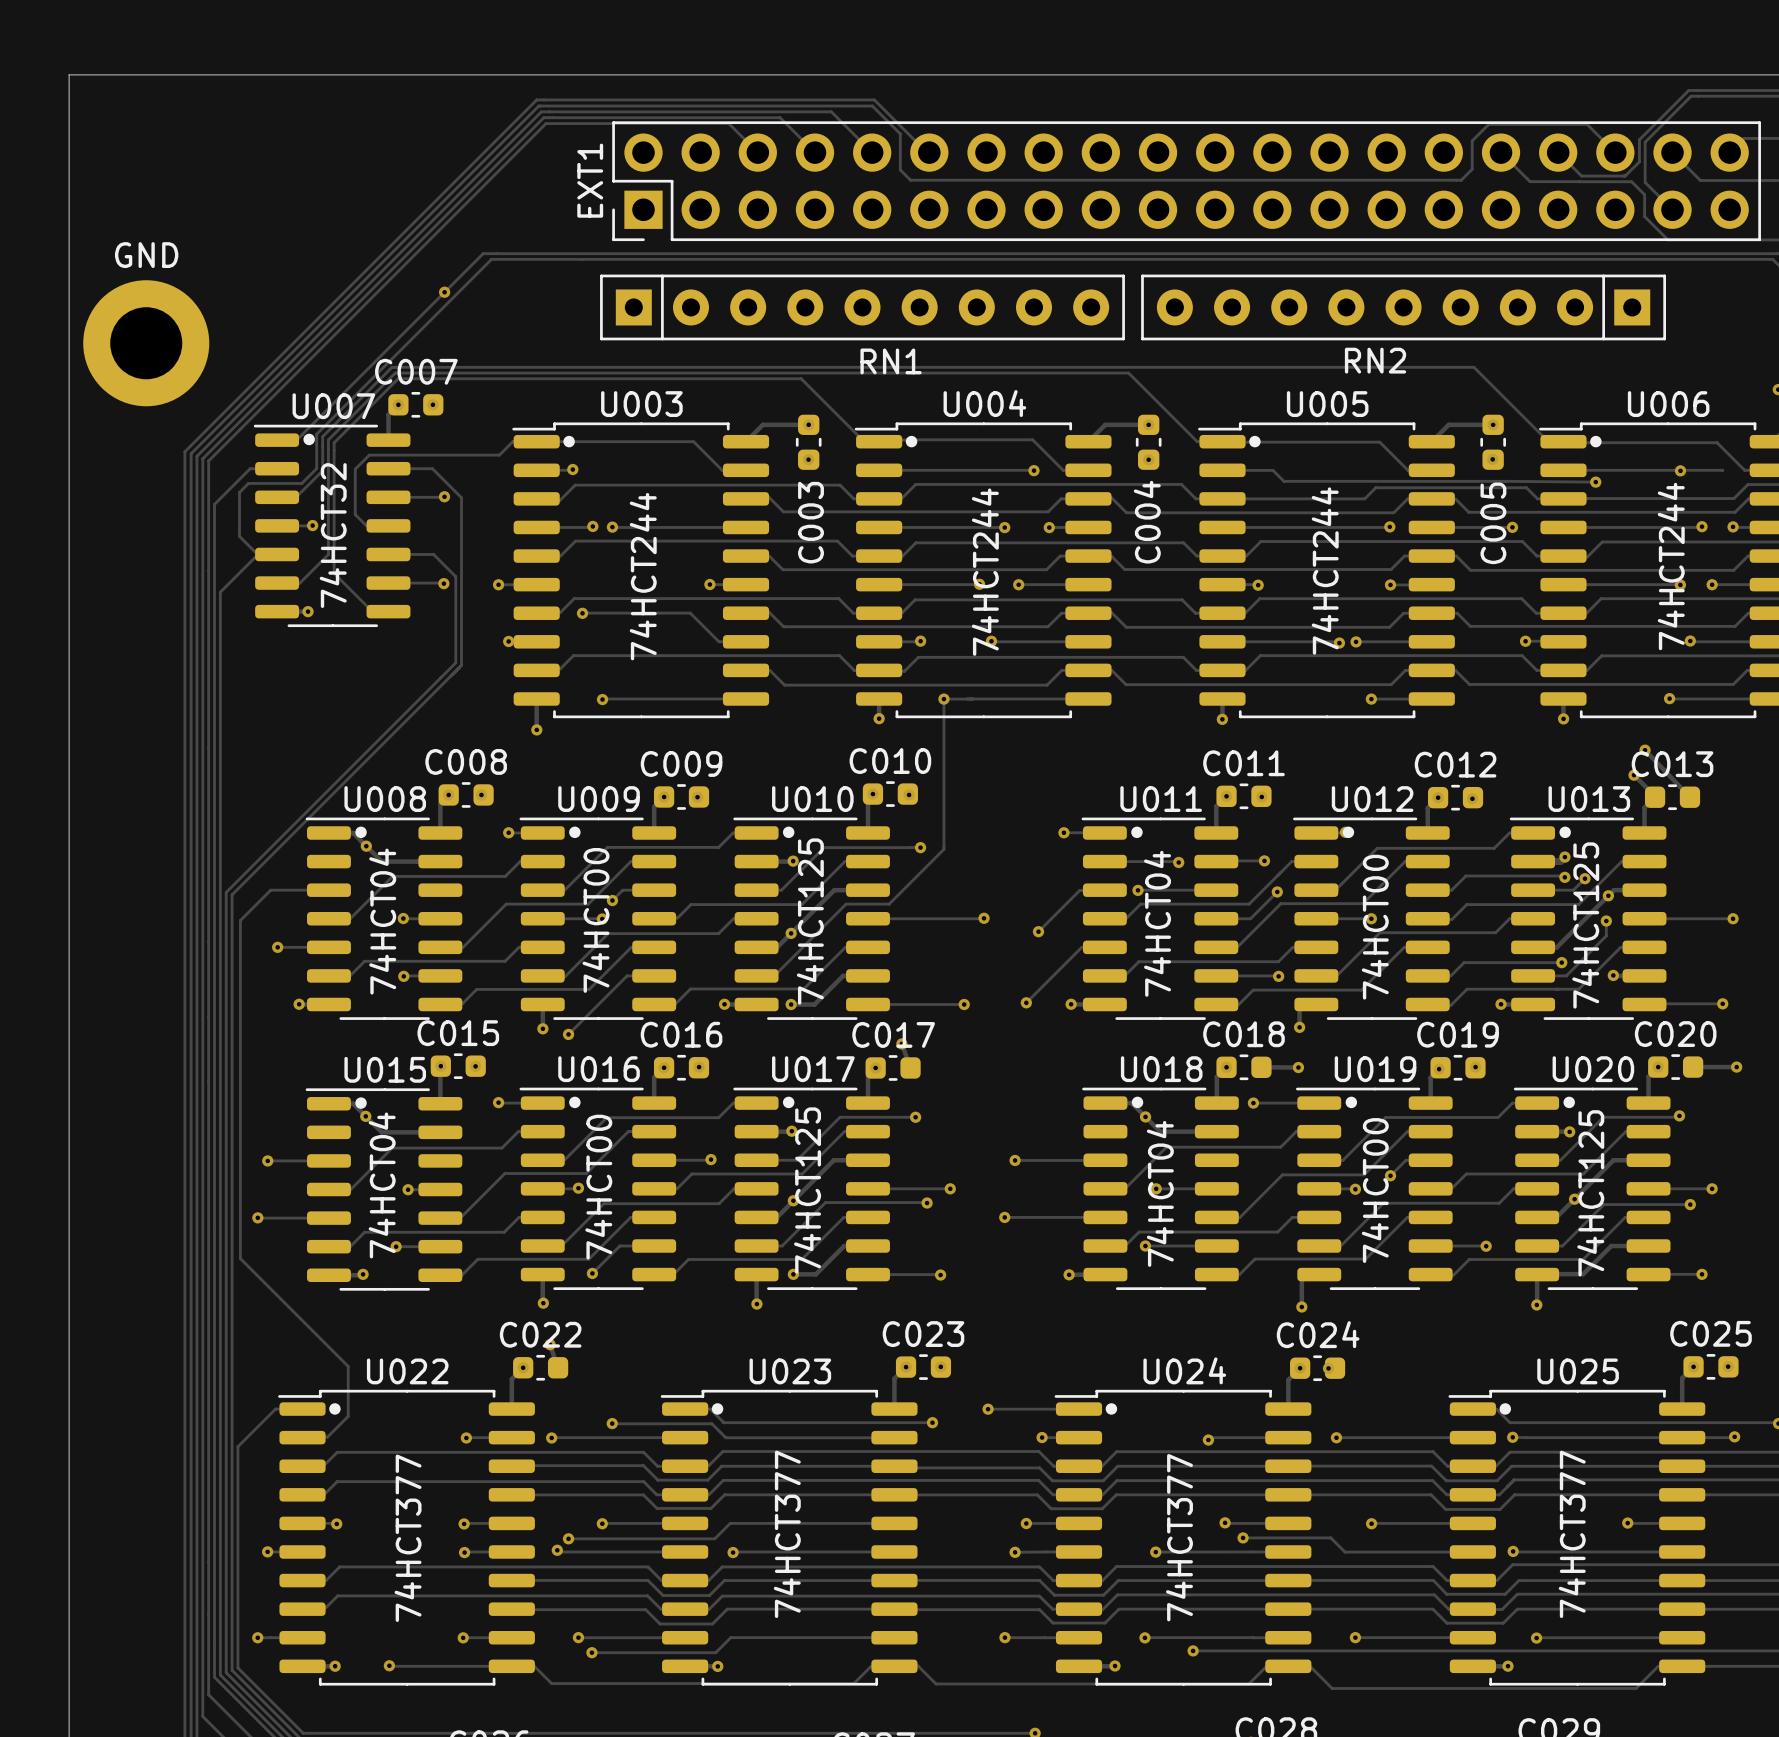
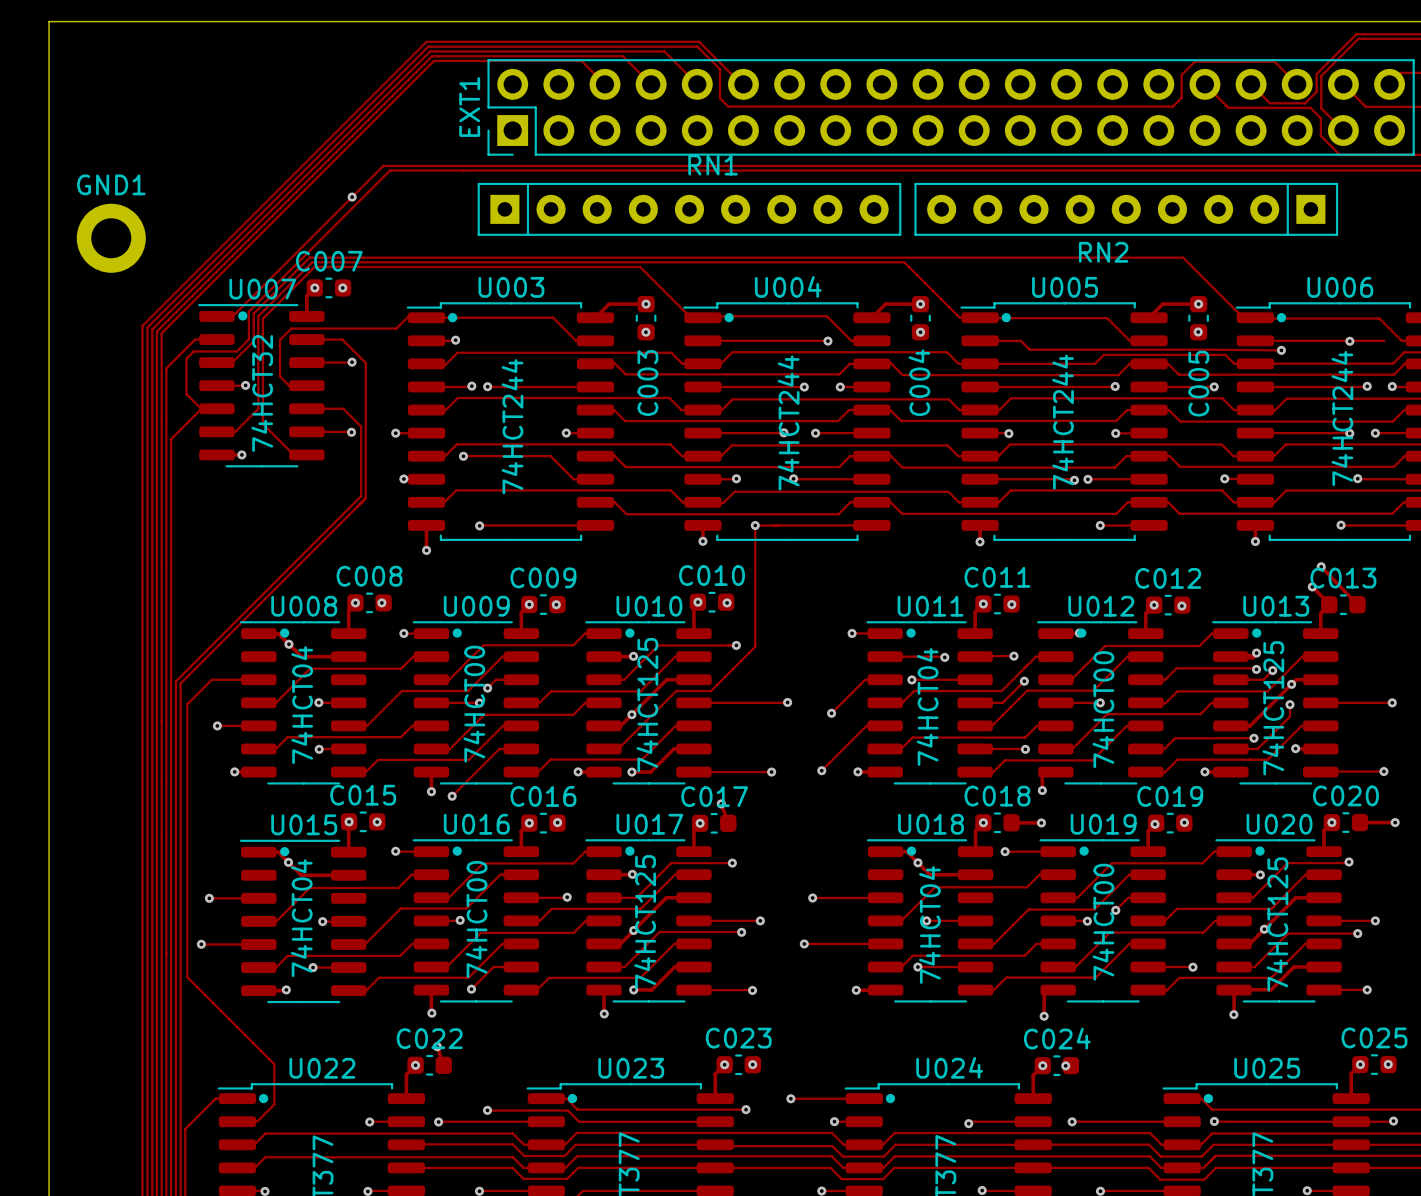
part: GND (146, 343) -> none
GND1: none -> (111, 238)
RN1 name position: RN1 (891, 361) -> RN1 (713, 165)

